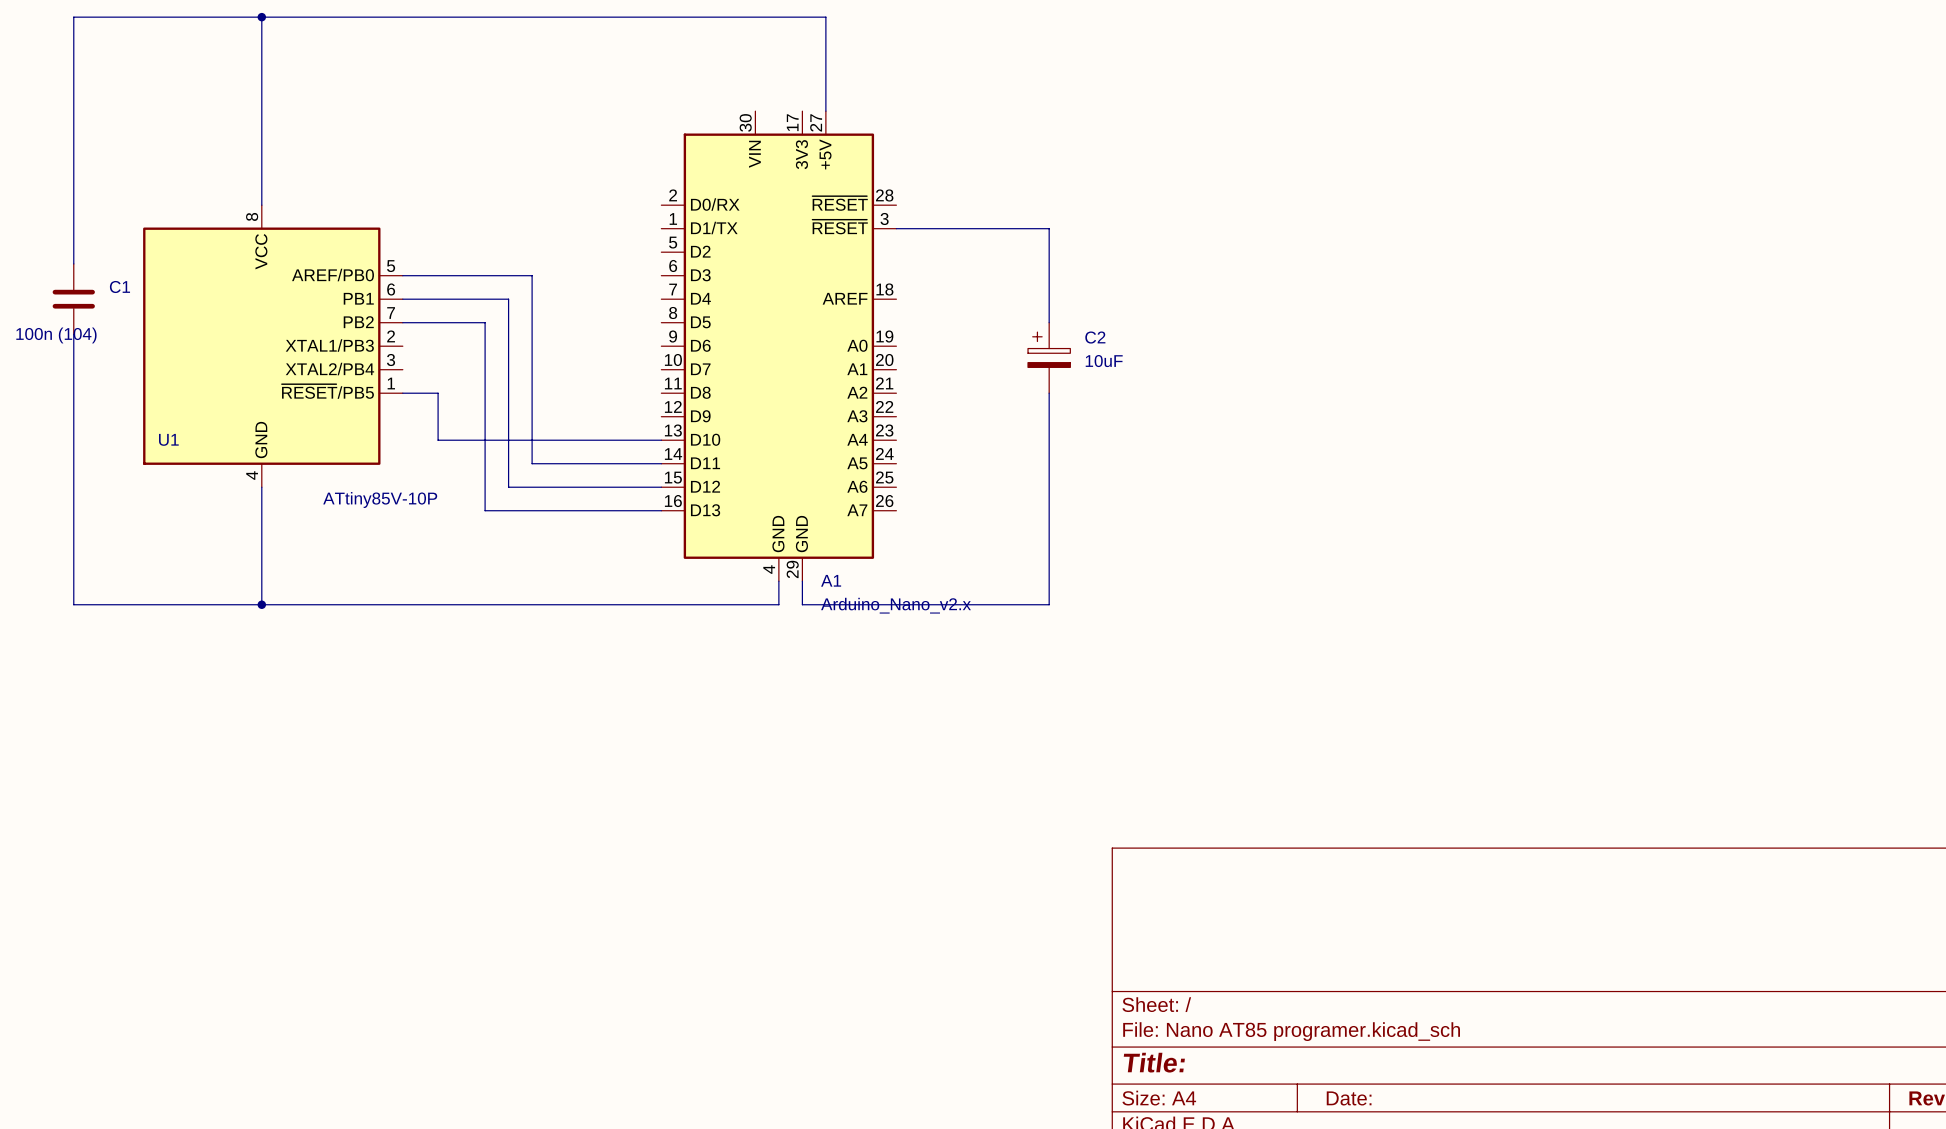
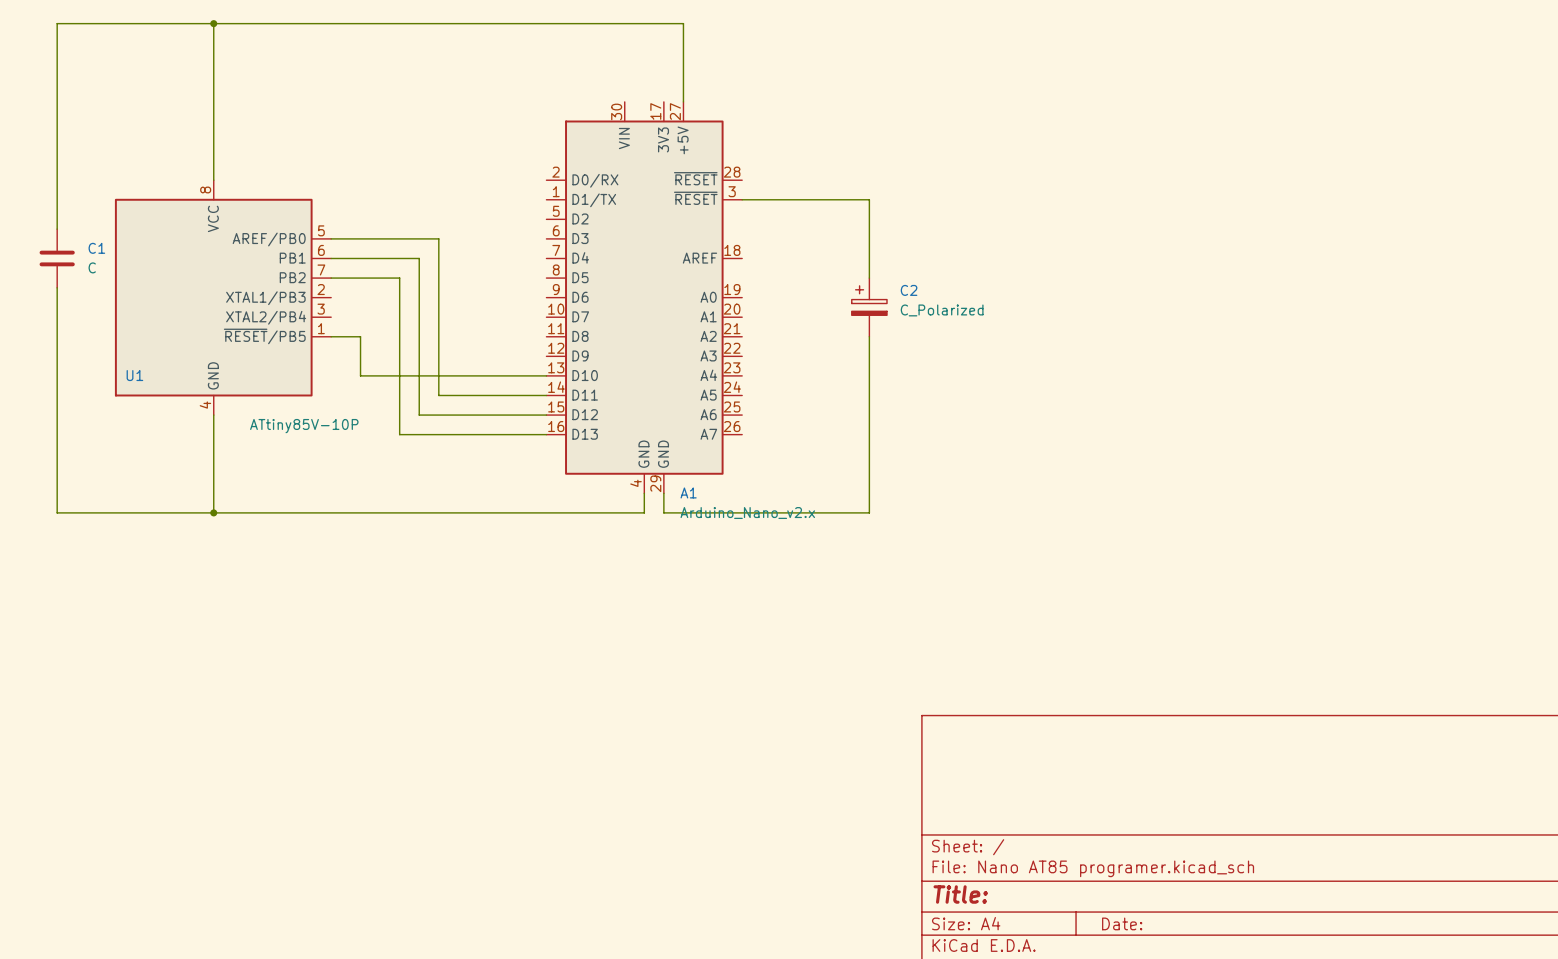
C1 value: 100n (104) (56, 335) -> C (92, 267)
C2 value: 10uF (1104, 361) -> C_Polarized (942, 310)

